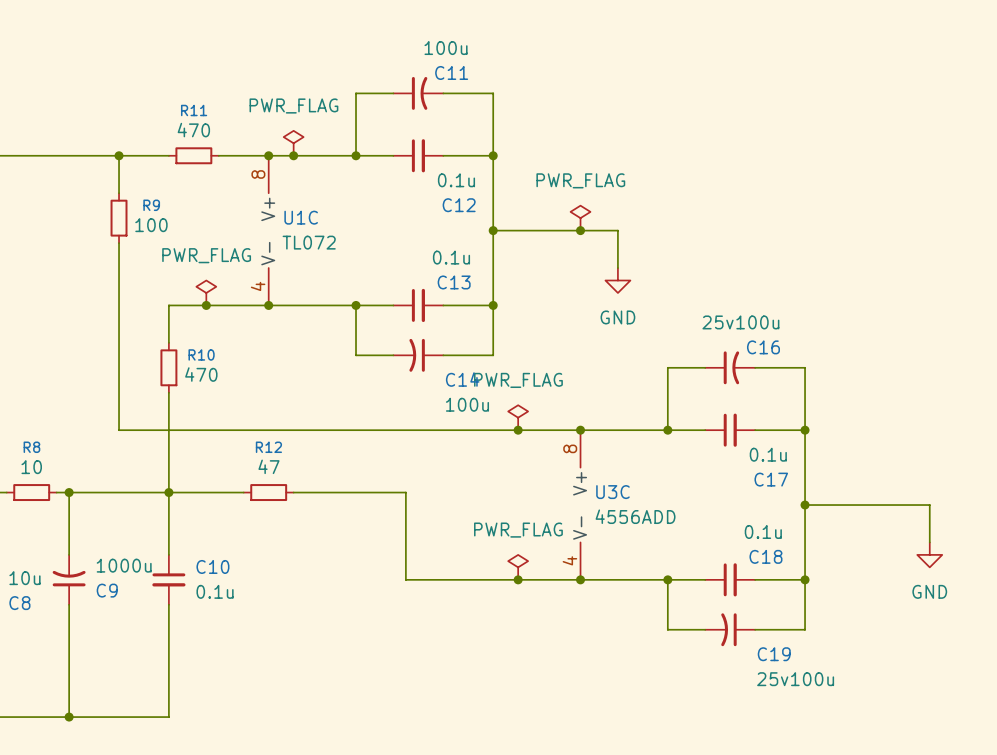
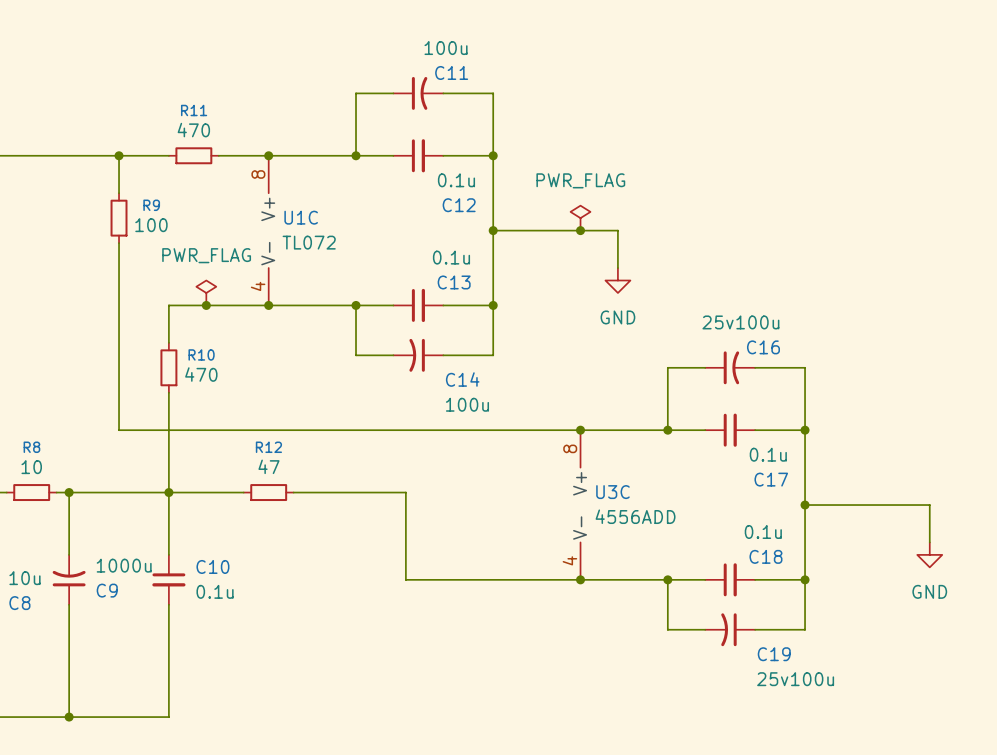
power symbol: PWR_FLAG (293, 143) -> none
junction: (293, 155) -> none
power symbol: PWR_FLAG (518, 417) -> none
junction: (518, 430) -> none
power symbol: PWR_FLAG (518, 567) -> none
junction: (518, 579) -> none

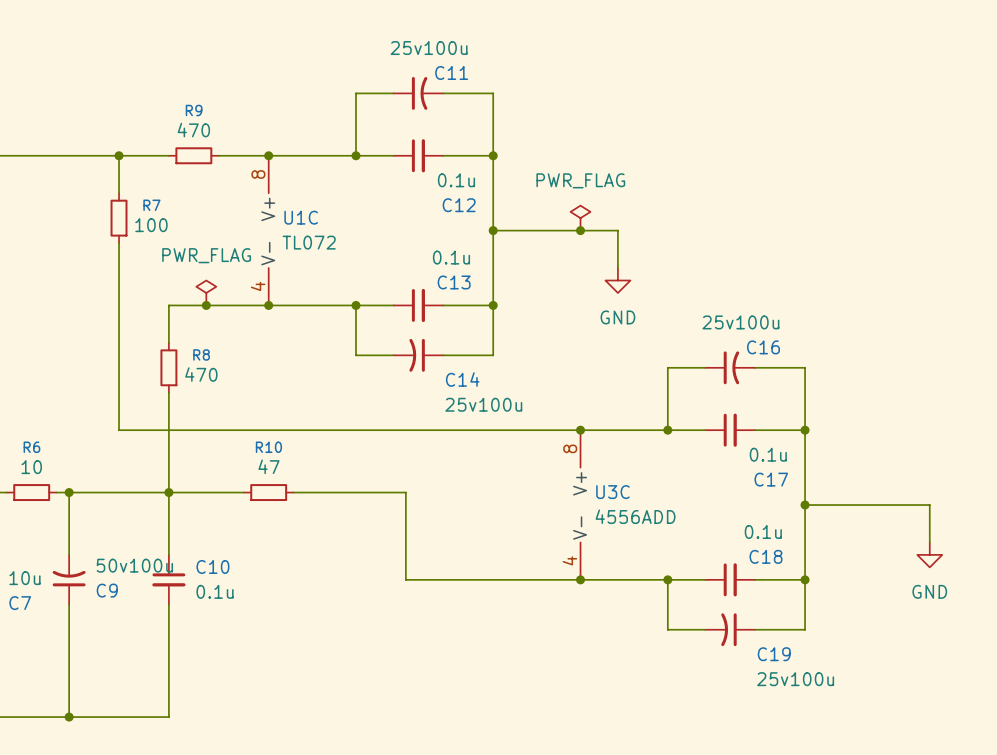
C11 value: 100u (446, 48) -> 25v100u (429, 48)
R11 name: R11 (194, 110) -> R9 (194, 110)
R9 name: R9 (151, 205) -> R7 (151, 205)
R10 name: R10 (201, 354) -> R8 (201, 354)
C14 value: 100u (467, 404) -> 25v100u (483, 404)
R8 name: R8 (31, 447) -> R6 (31, 447)
R12 name: R12 (268, 447) -> R10 (268, 447)
C9 value: 1000u (124, 565) -> 50v100u (134, 565)
C8 name: C8 (19, 603) -> C7 (20, 603)

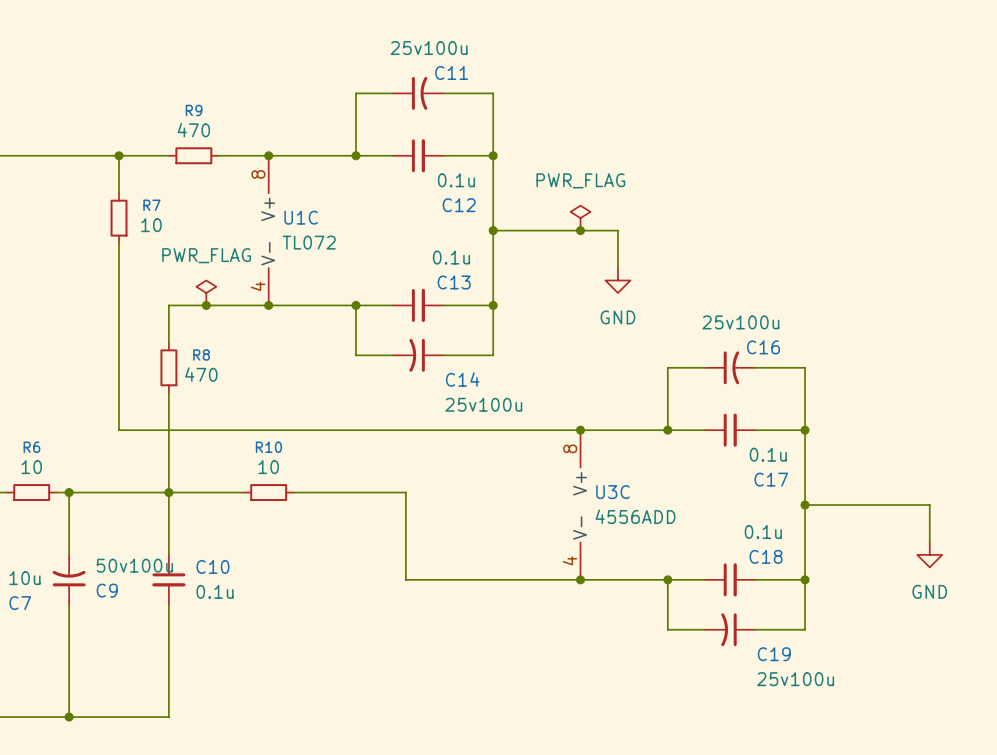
R7 value: 100 (151, 225) -> 10 (151, 225)
R10 value: 47 (268, 466) -> 10 (268, 467)

